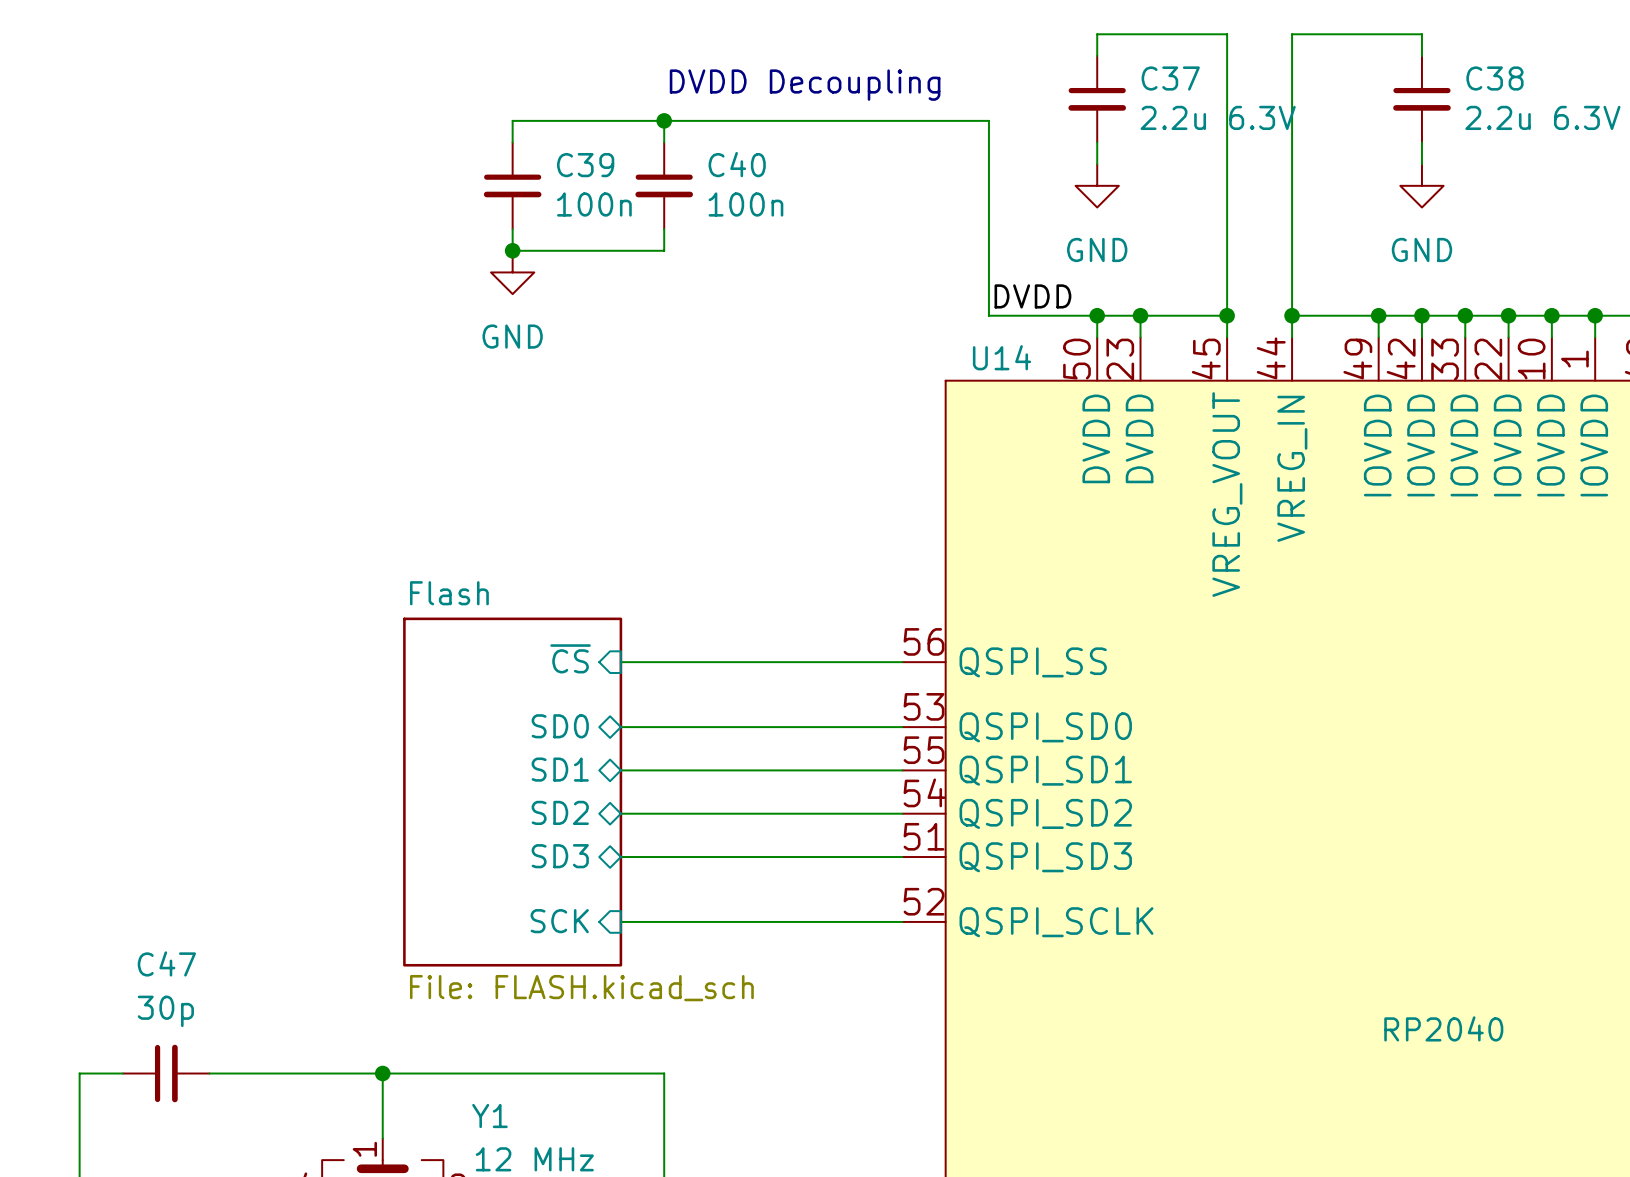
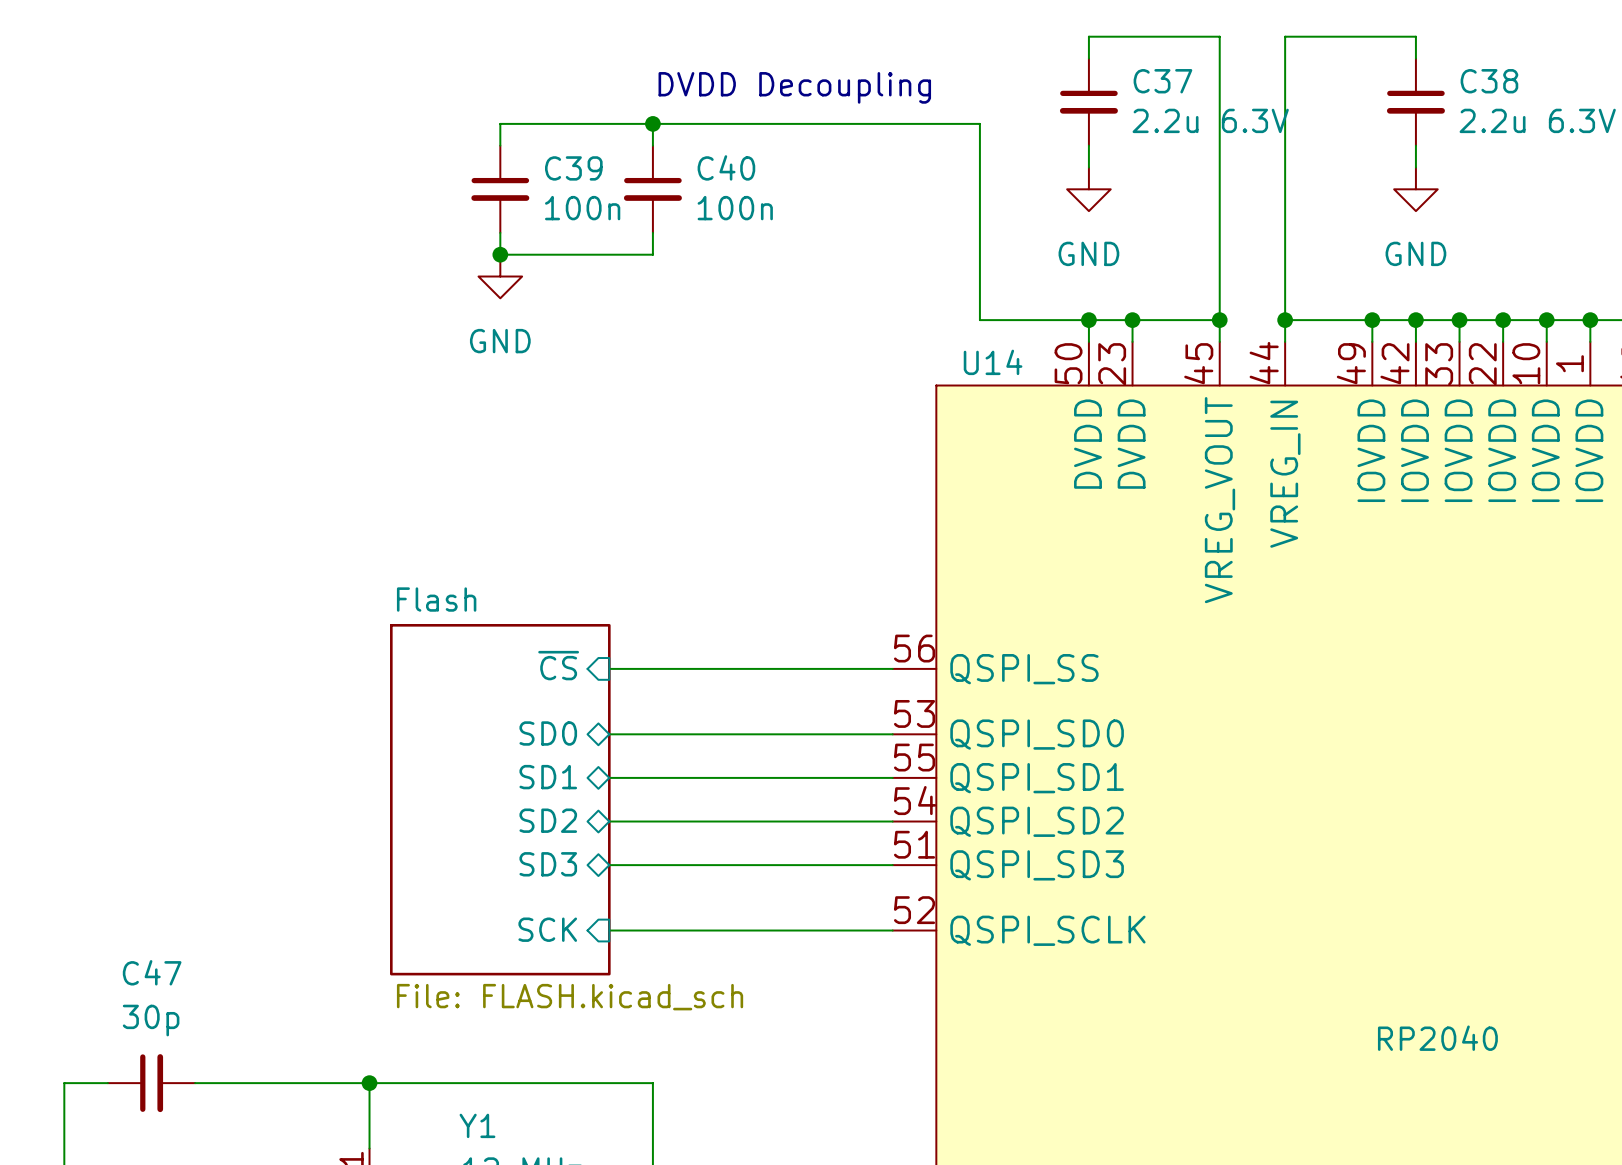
label: DVDD (1032, 296) -> none

